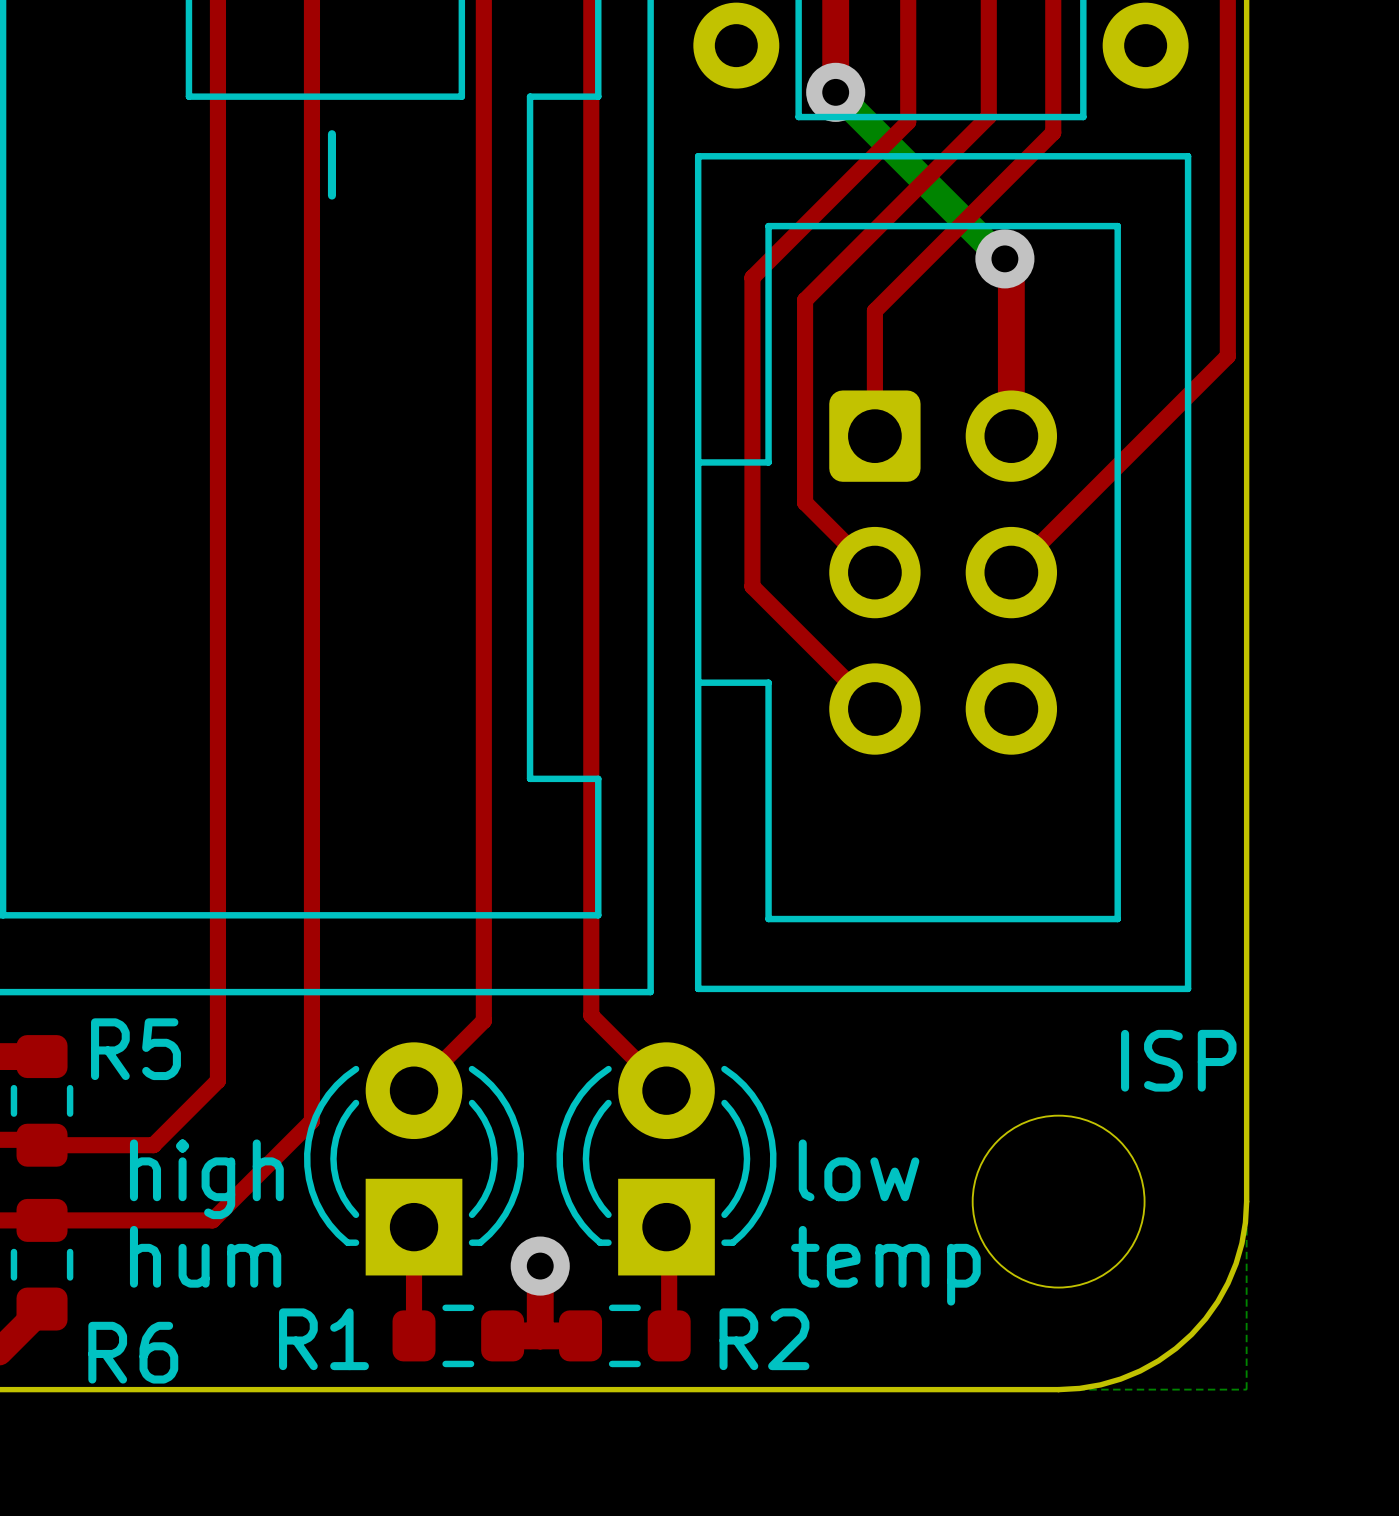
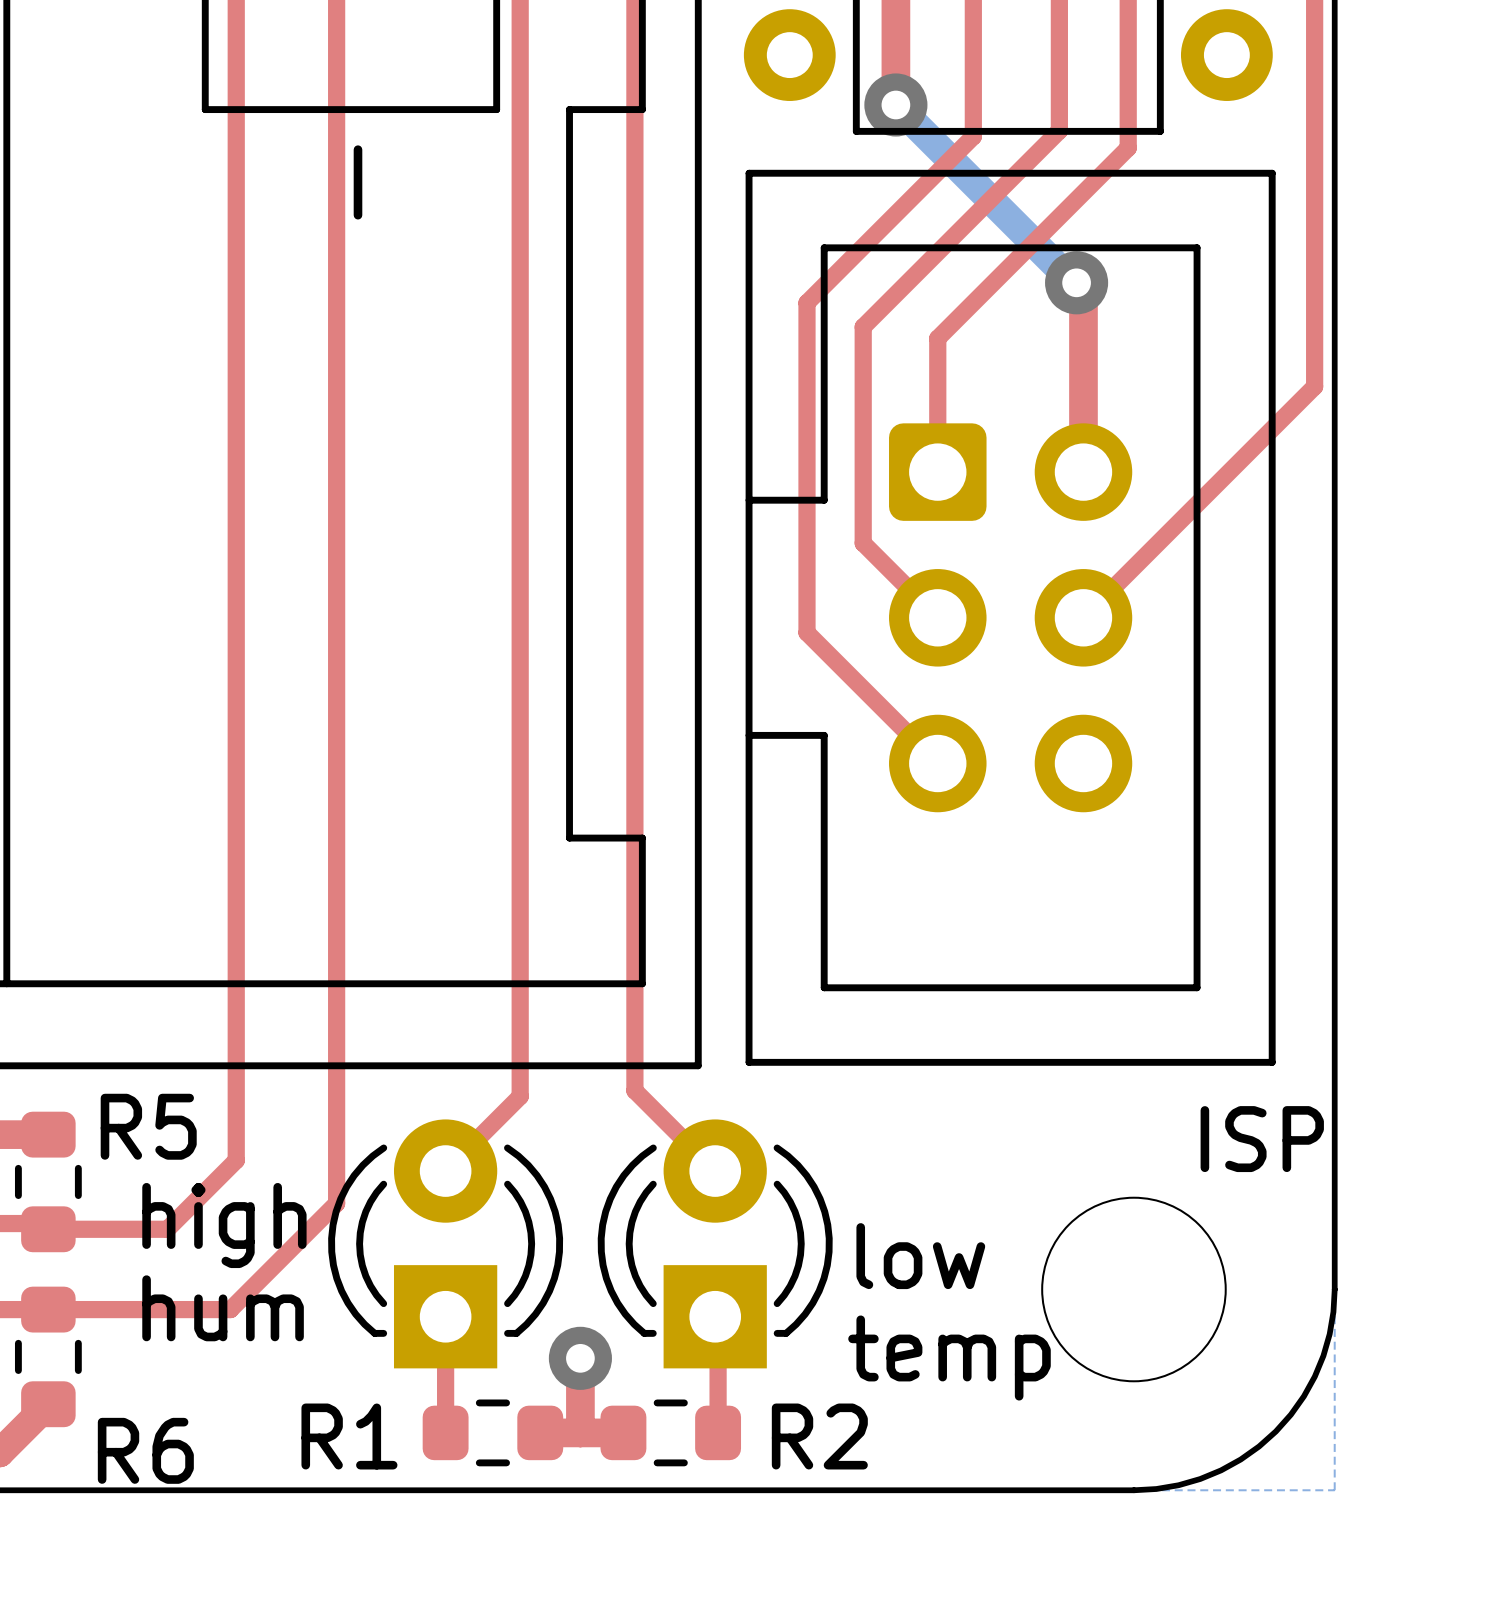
text position: high (206, 1179) -> high (224, 1225)
text position: hum (205, 1256) -> hum (223, 1308)

